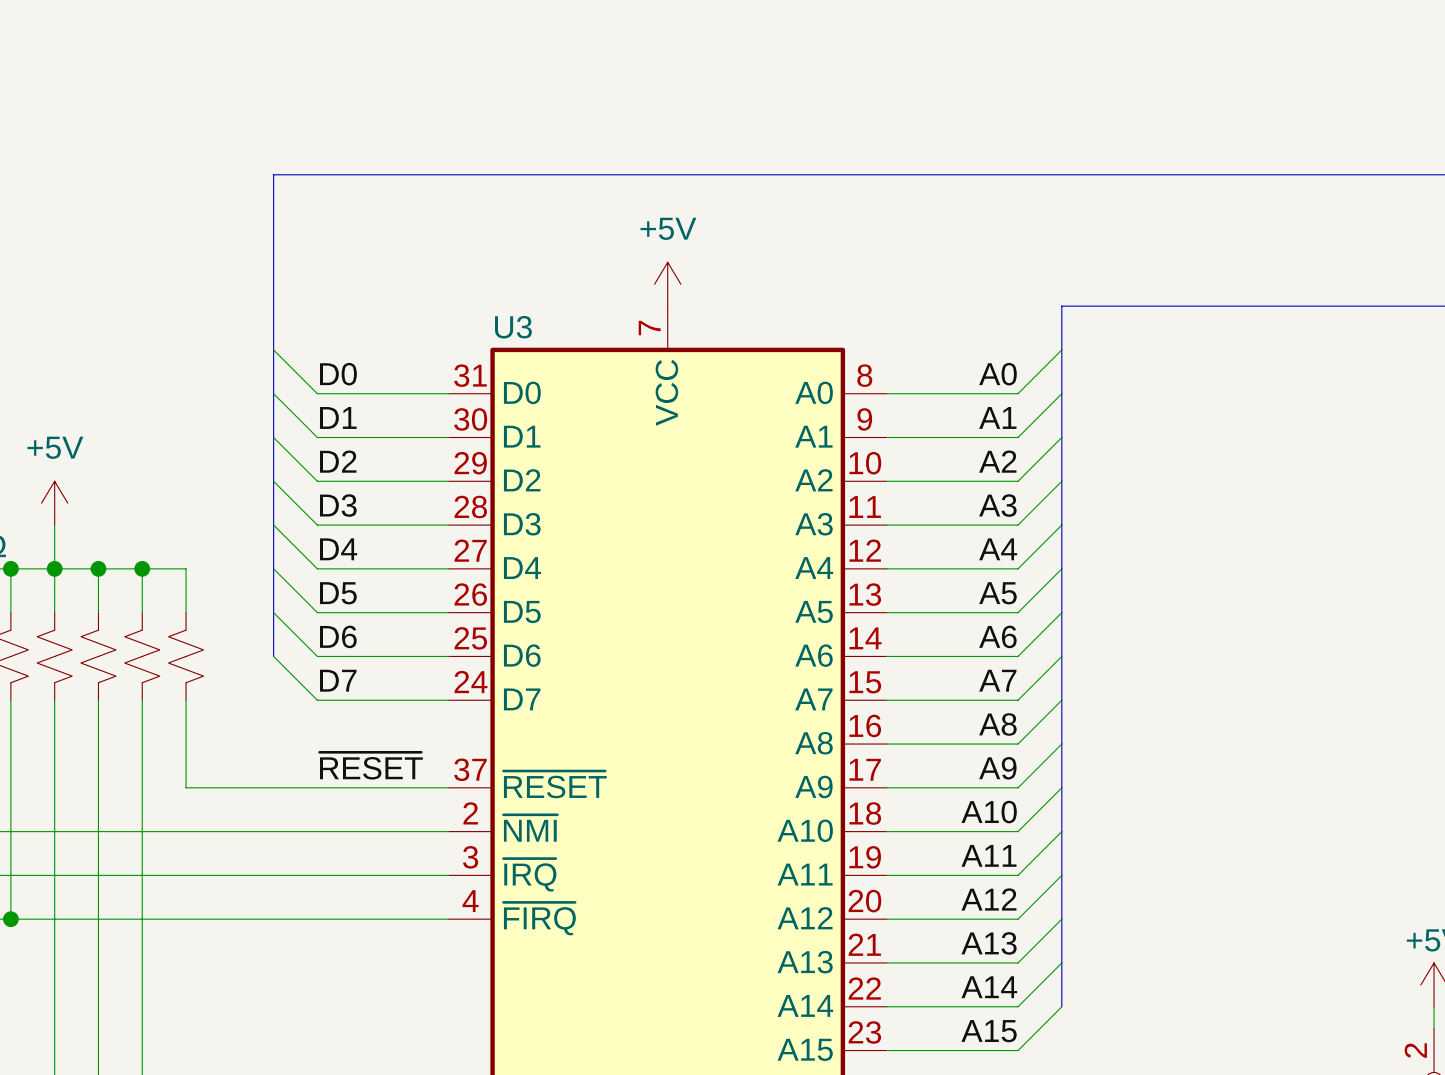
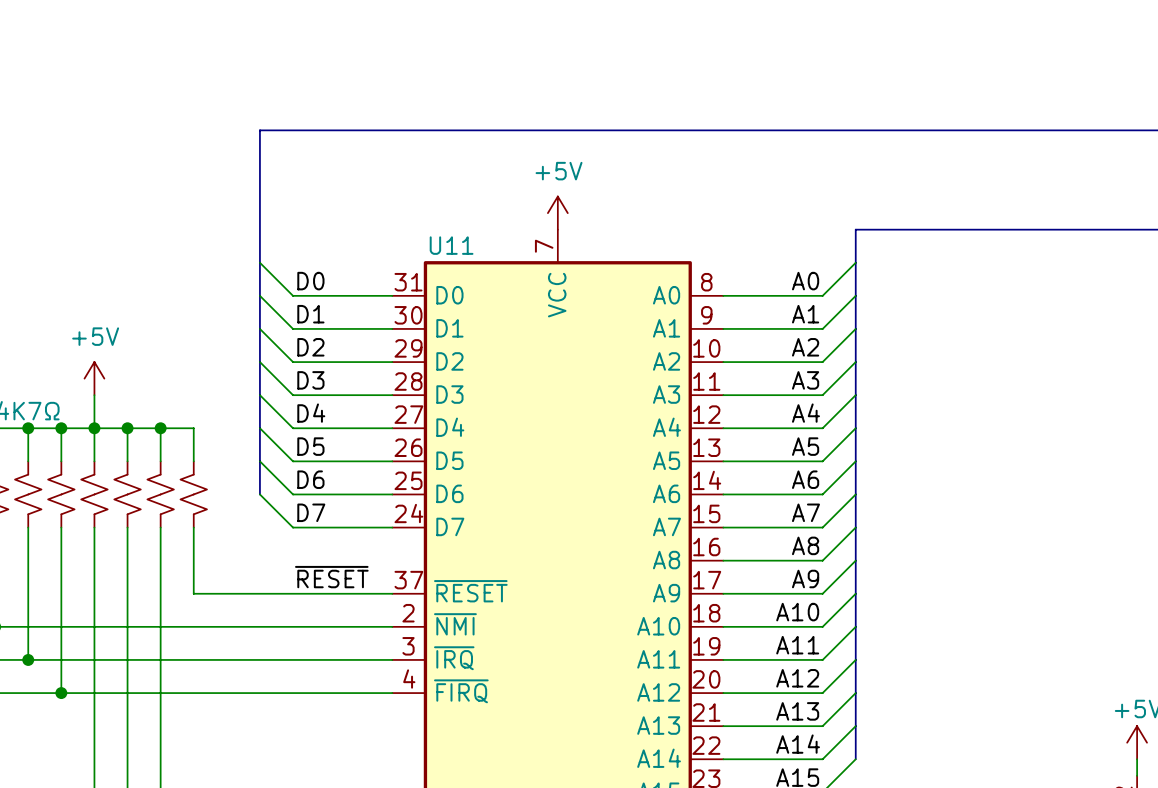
U3 name: U3 (513, 327) -> U11 (451, 245)

